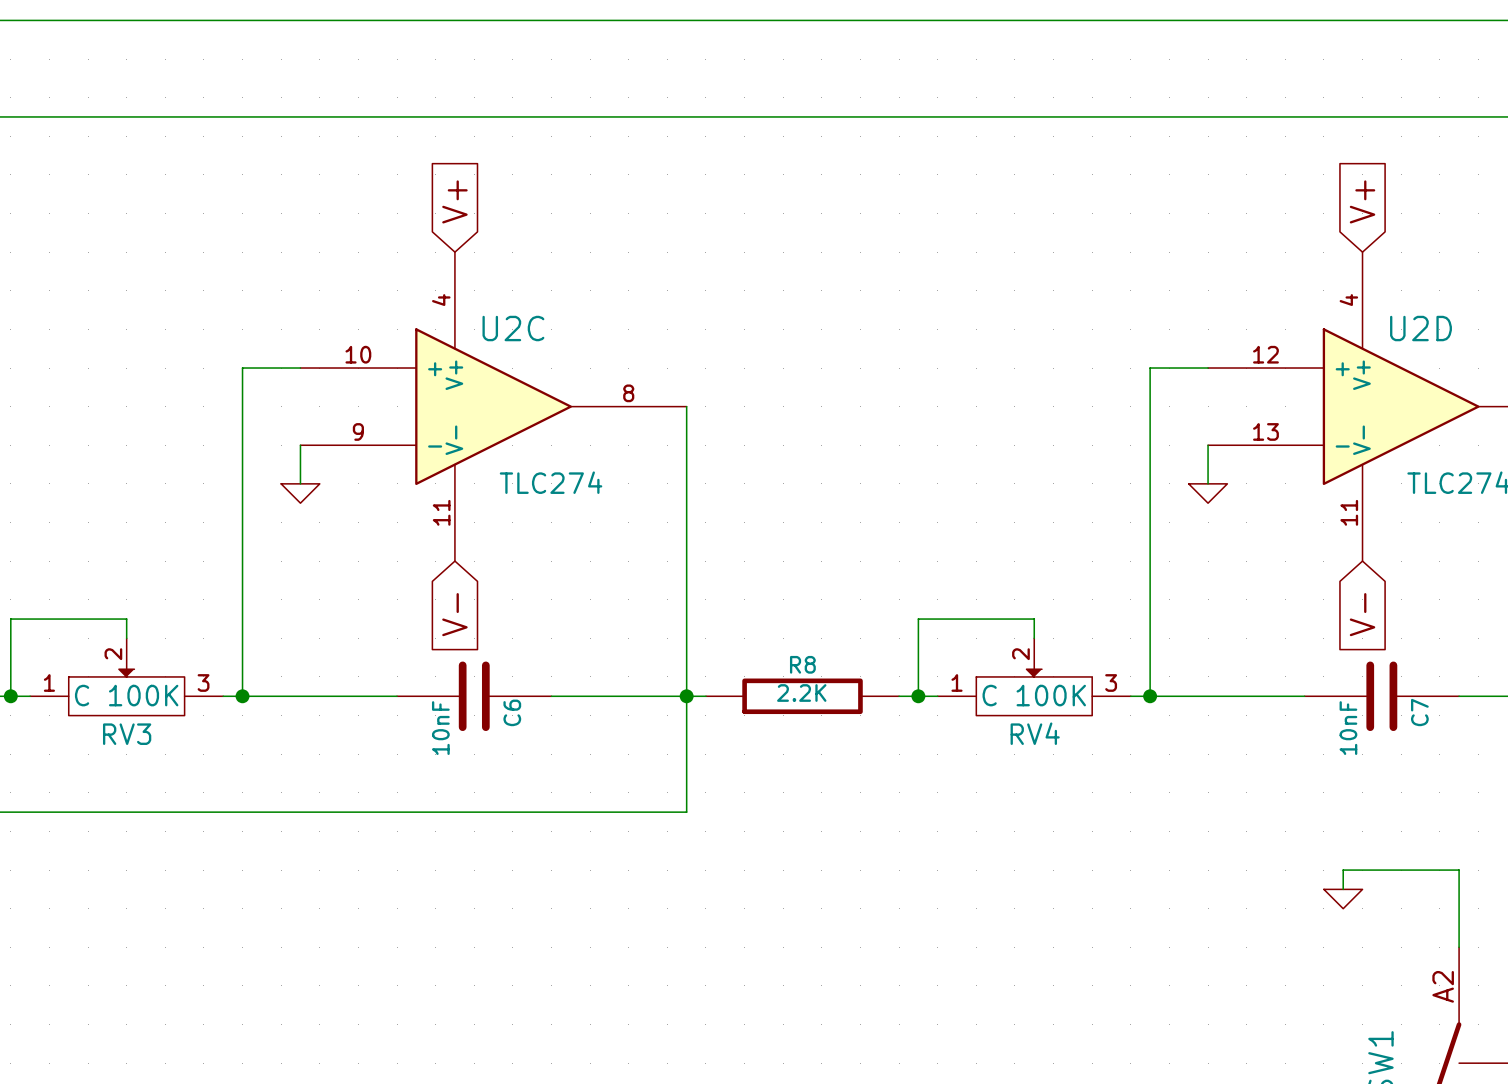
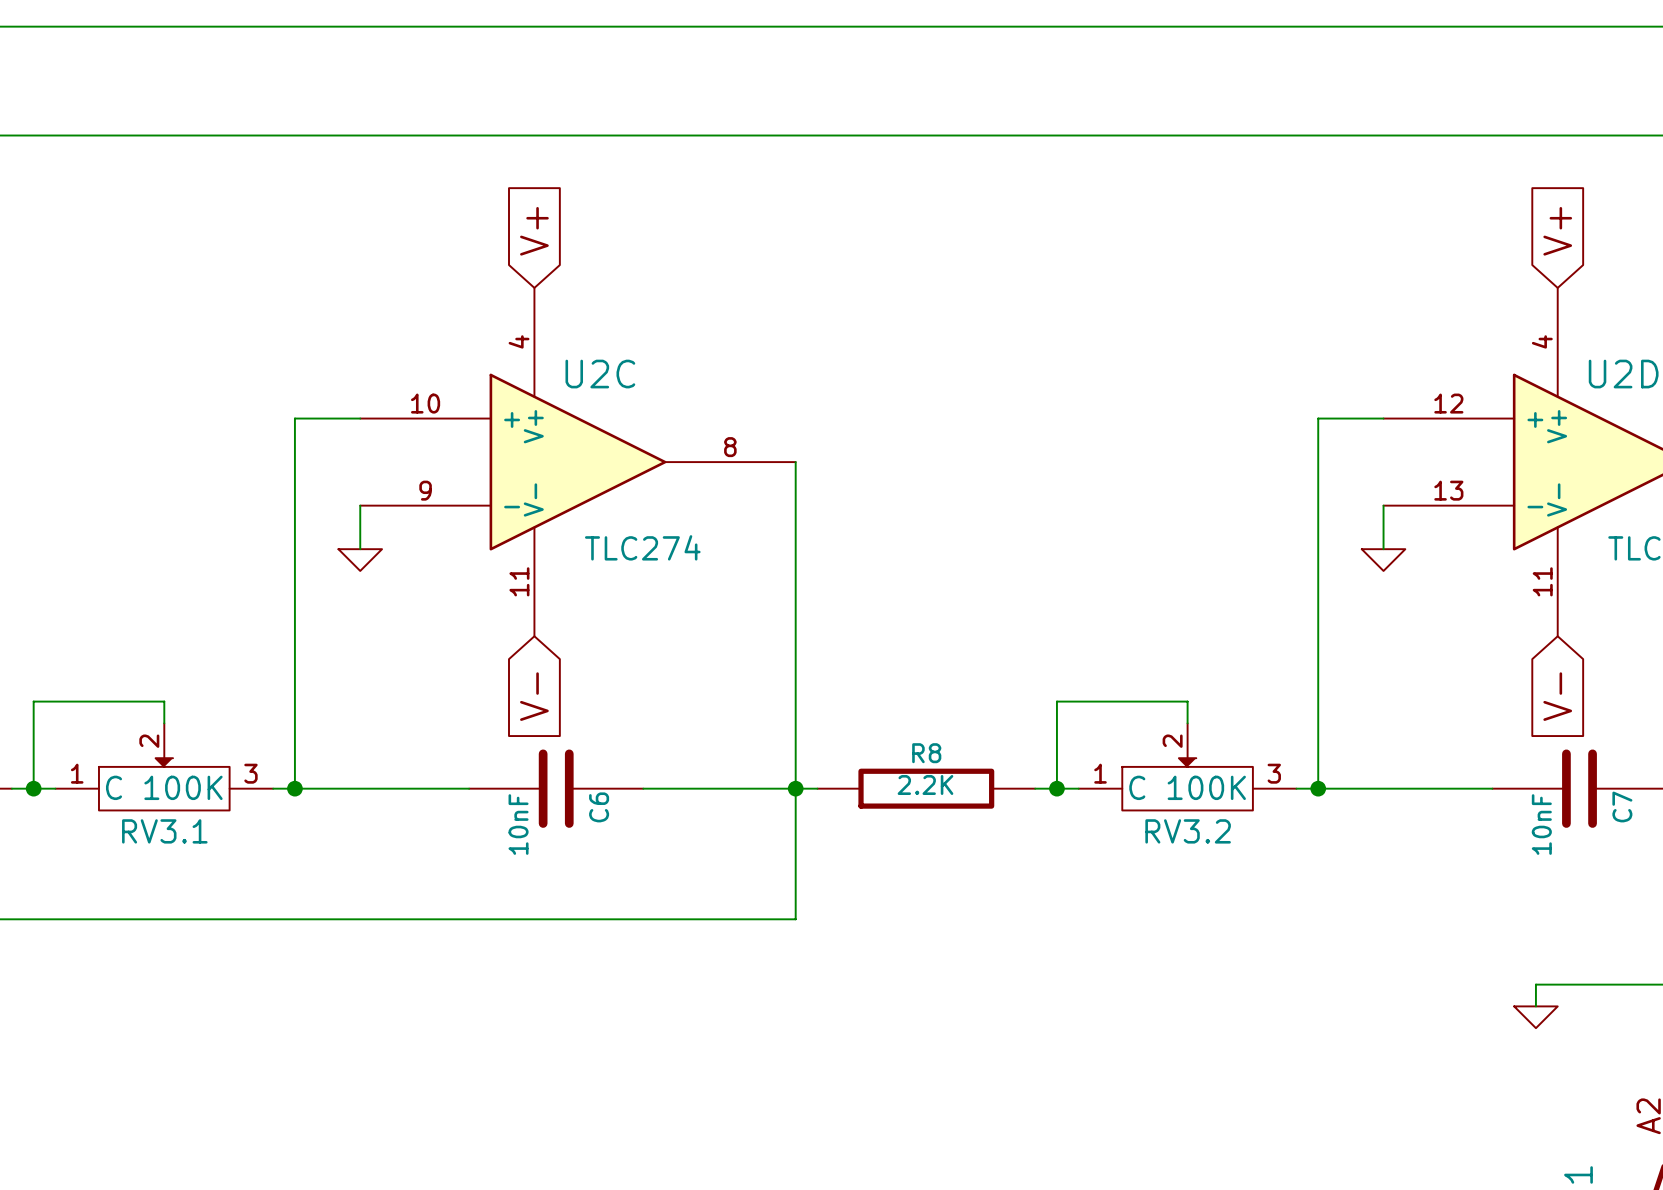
RV4 name: RV4 (1035, 733) -> RV3.2 (1188, 831)
RV3 name: RV3 (127, 734) -> RV3.1 (164, 831)

